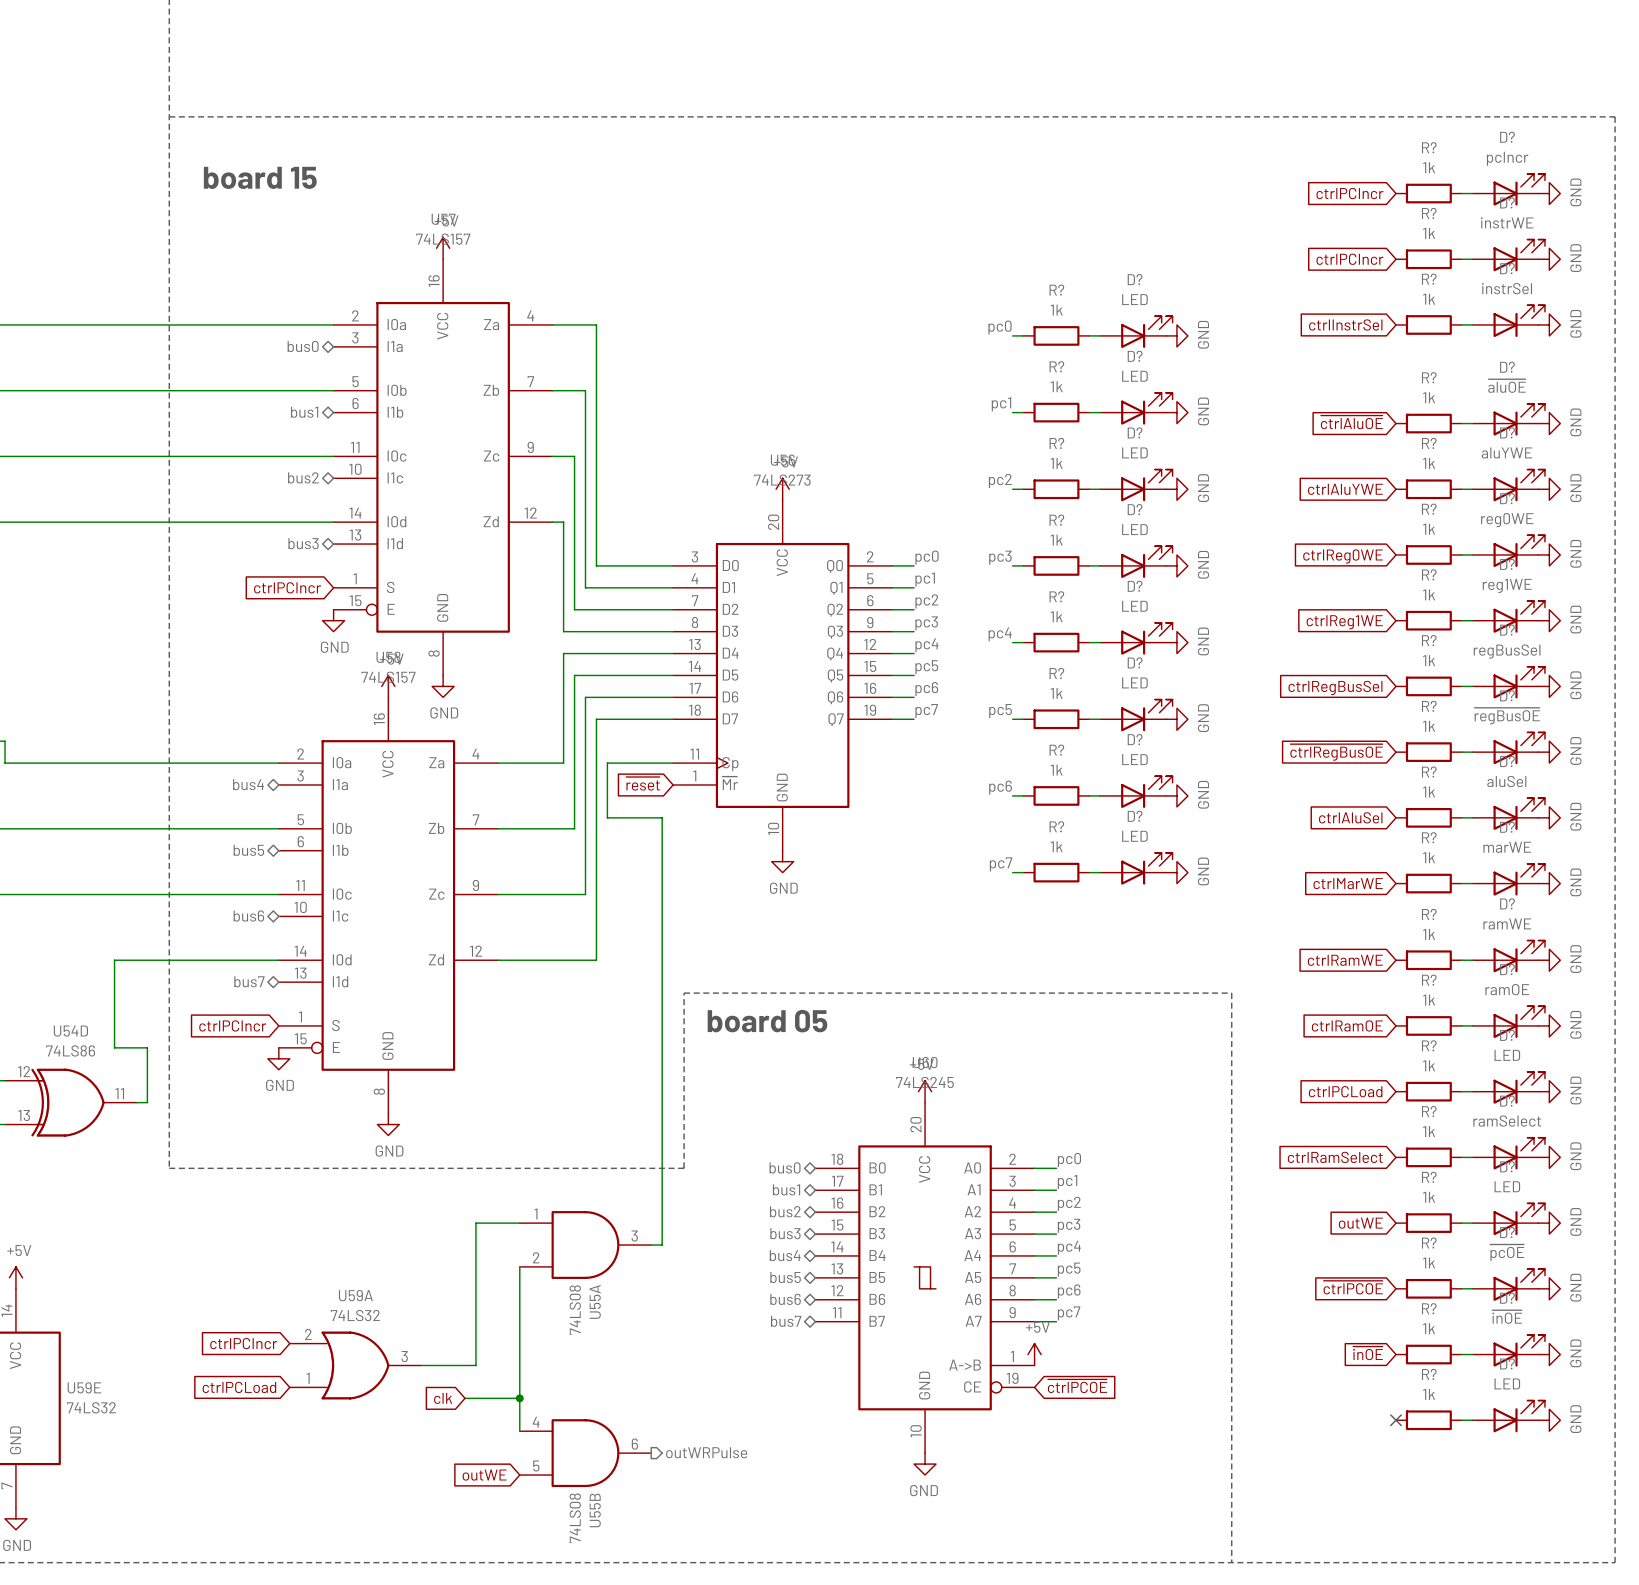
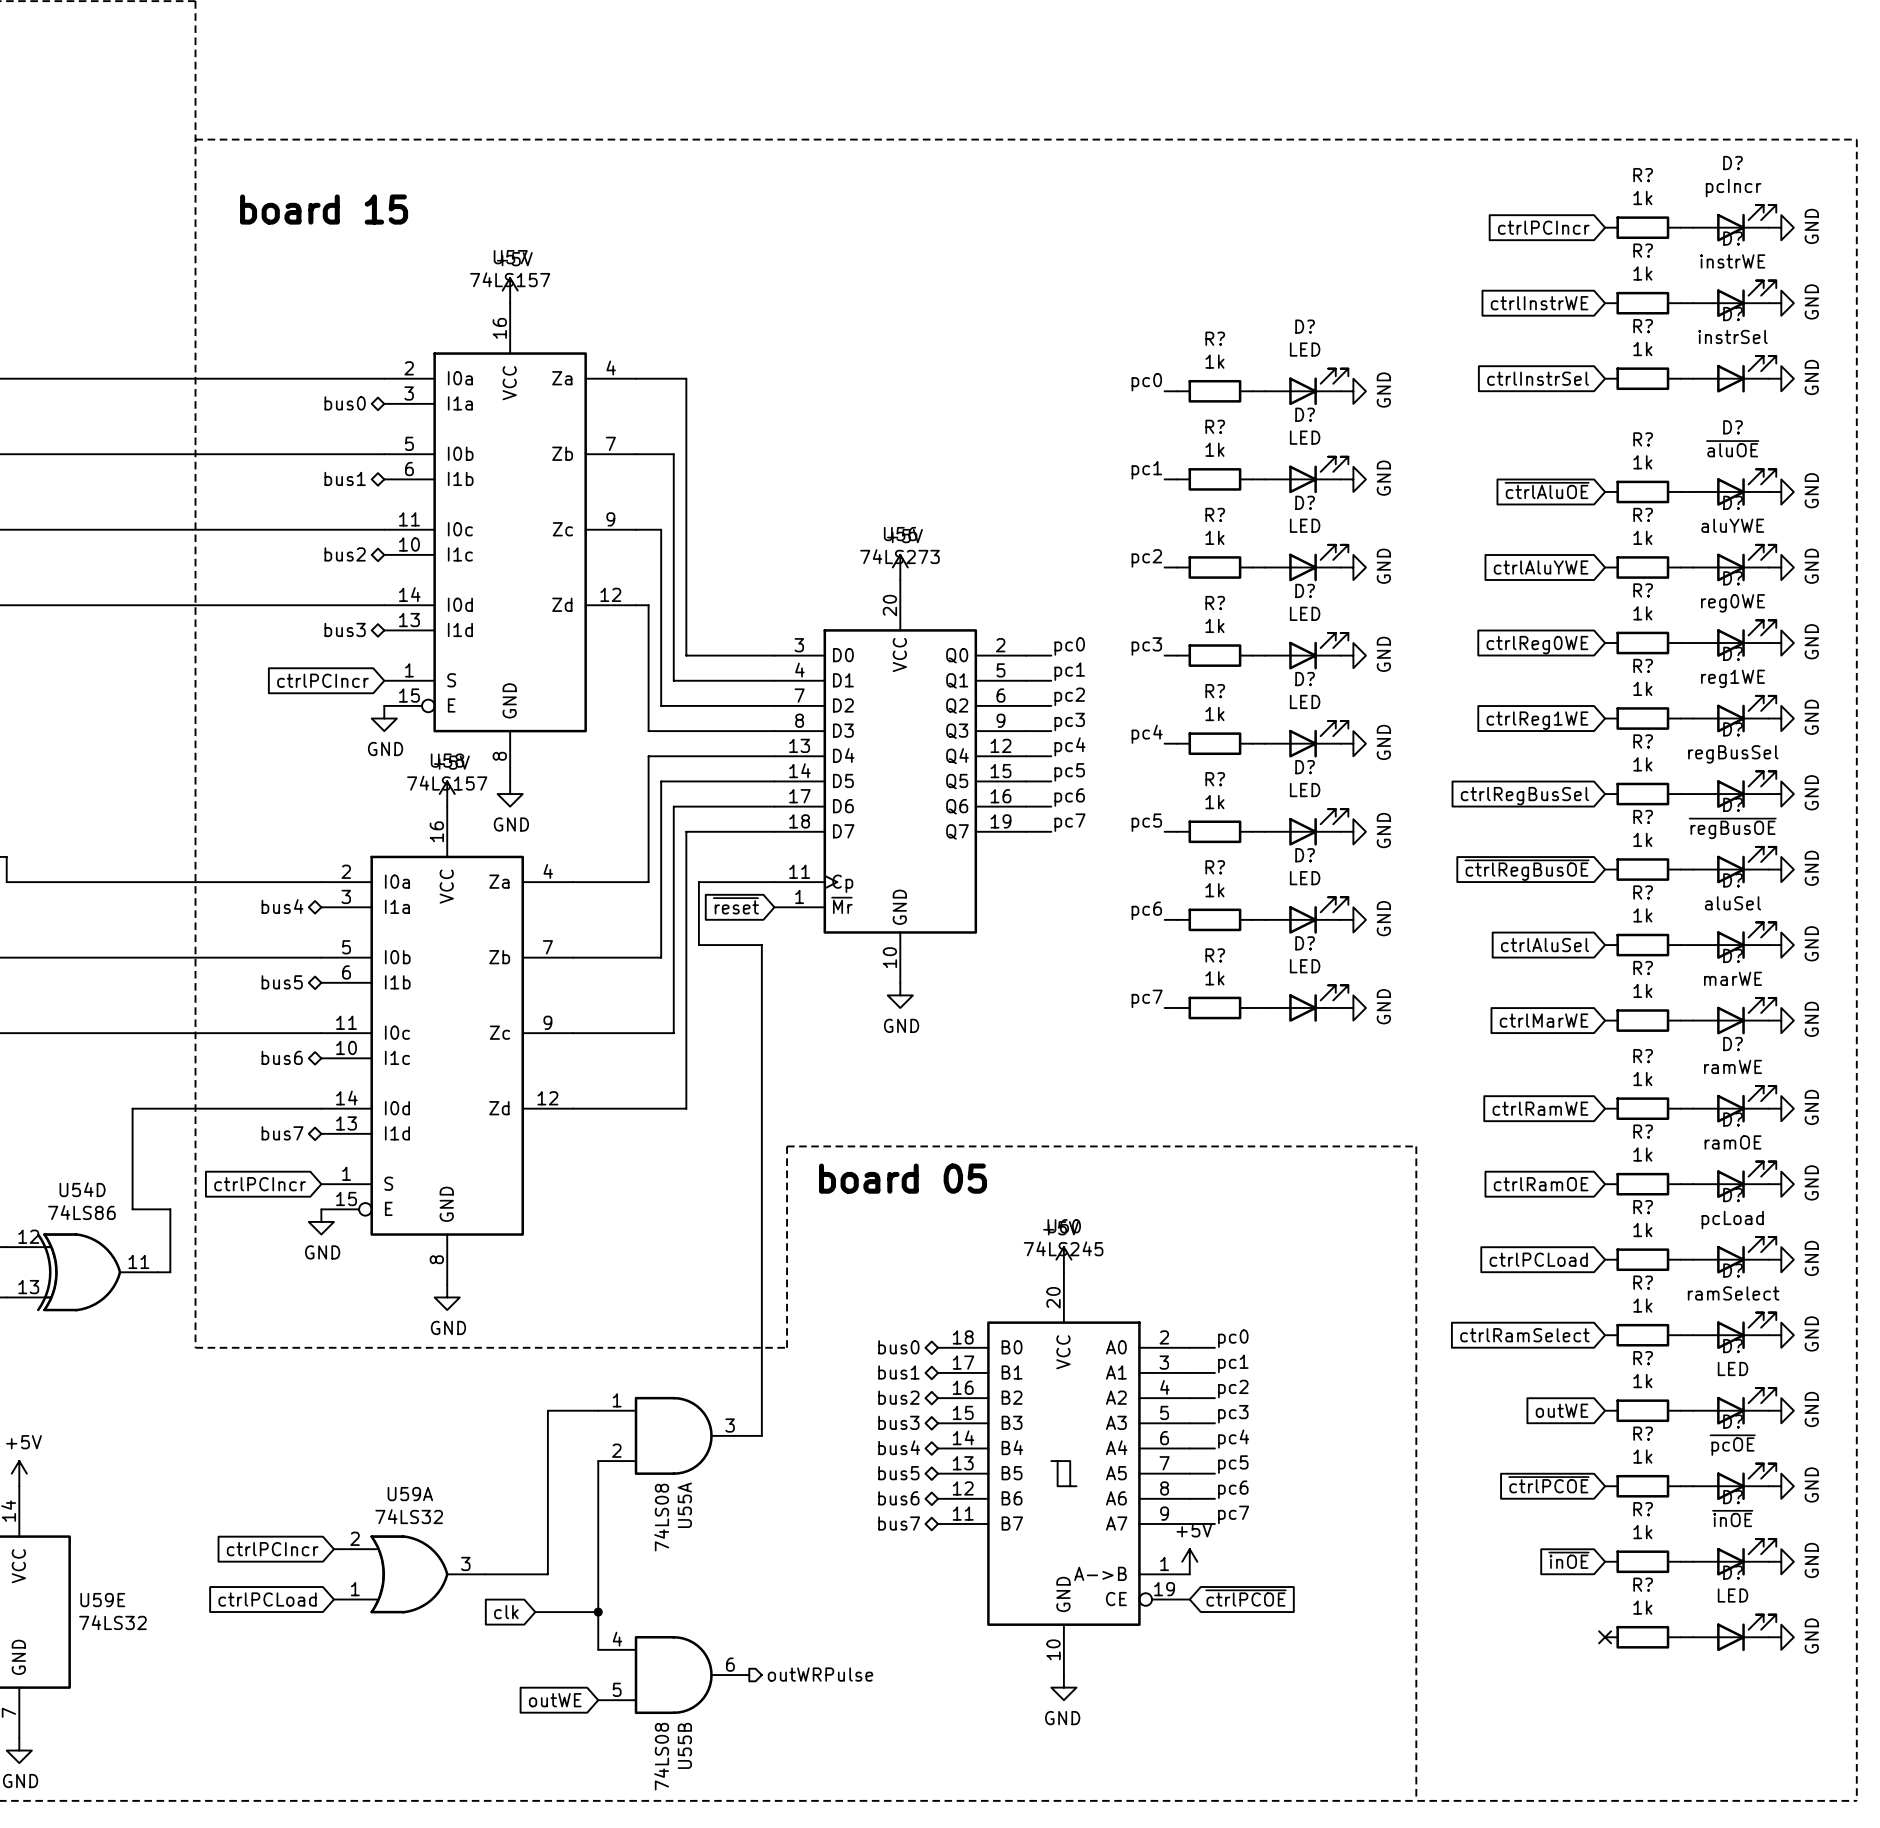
global label: ctrlPCIncr (1349, 259) -> ctrlInstrWE (1539, 303)
D? value: LED (1507, 1055) -> pcLoad (1732, 1220)

